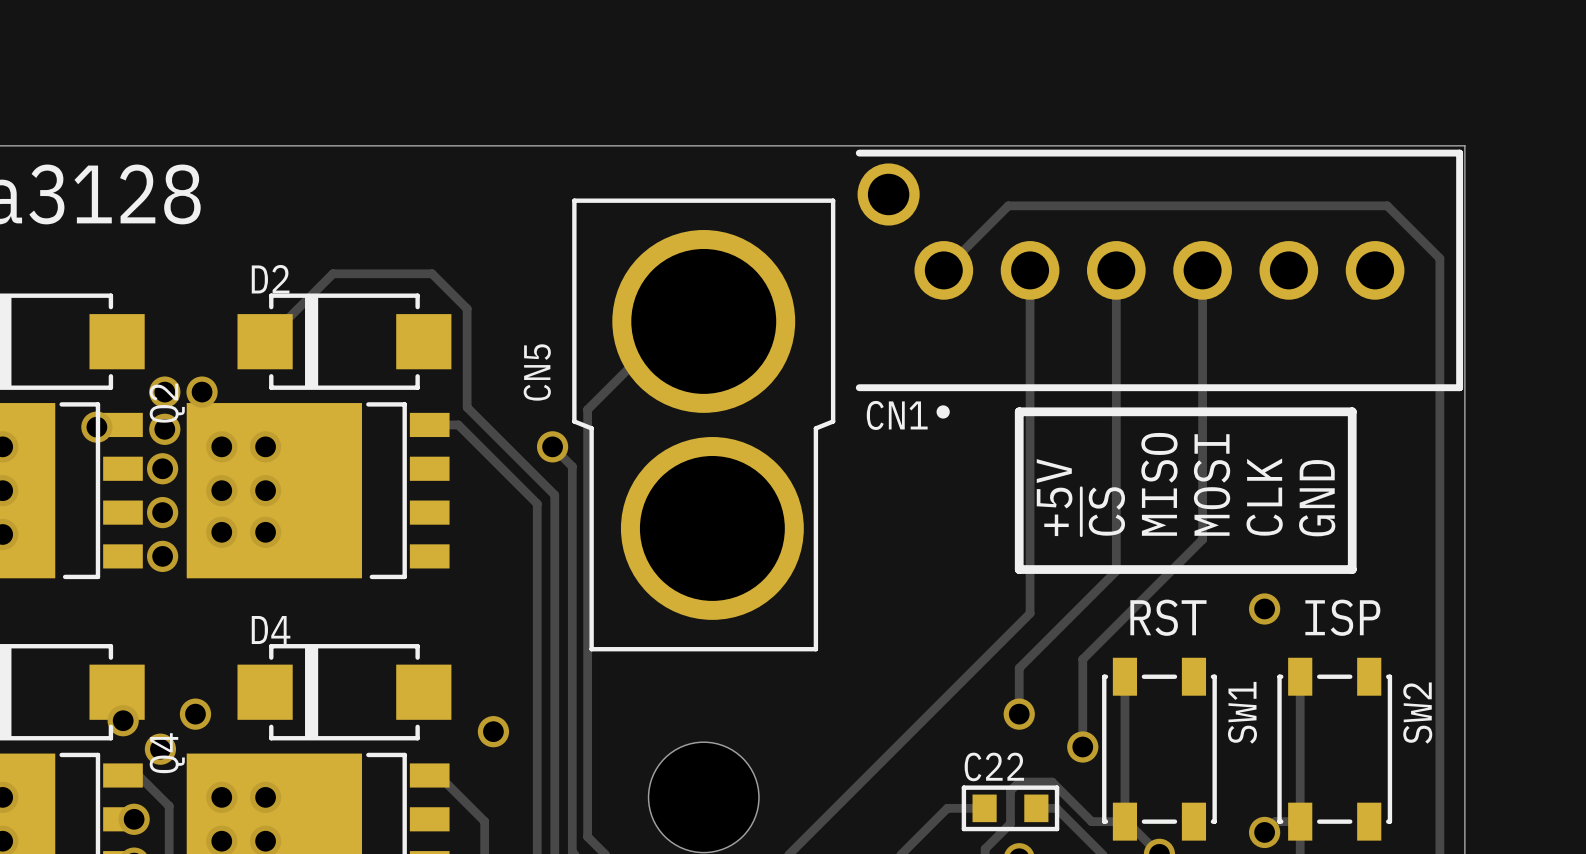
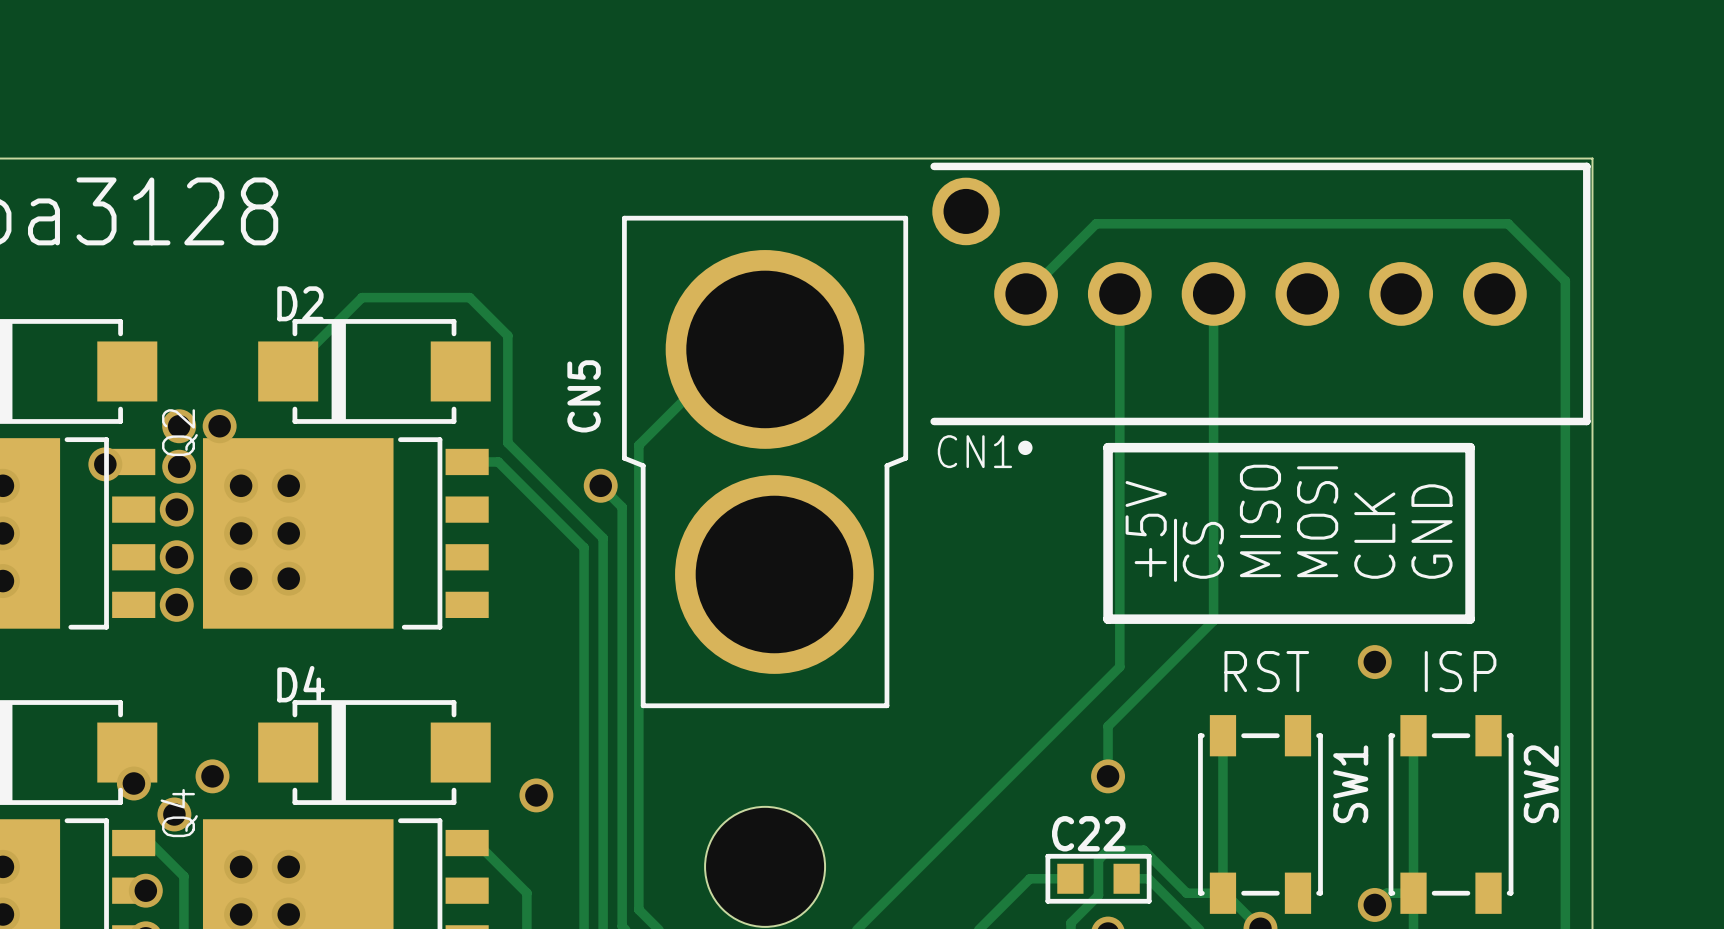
track: (1202, 270) (1202, 539) (1082, 659) (1082, 747) -> none
via: (1082, 747) -> none

